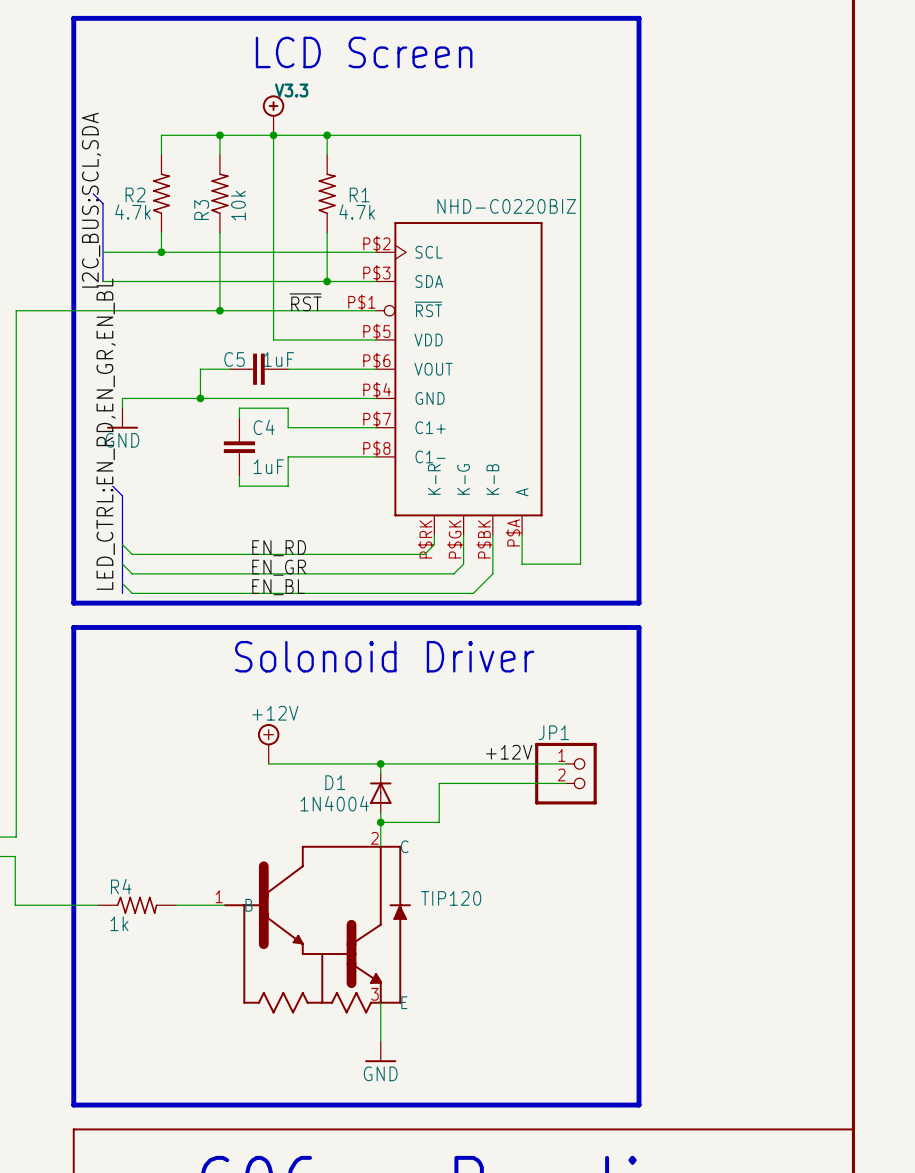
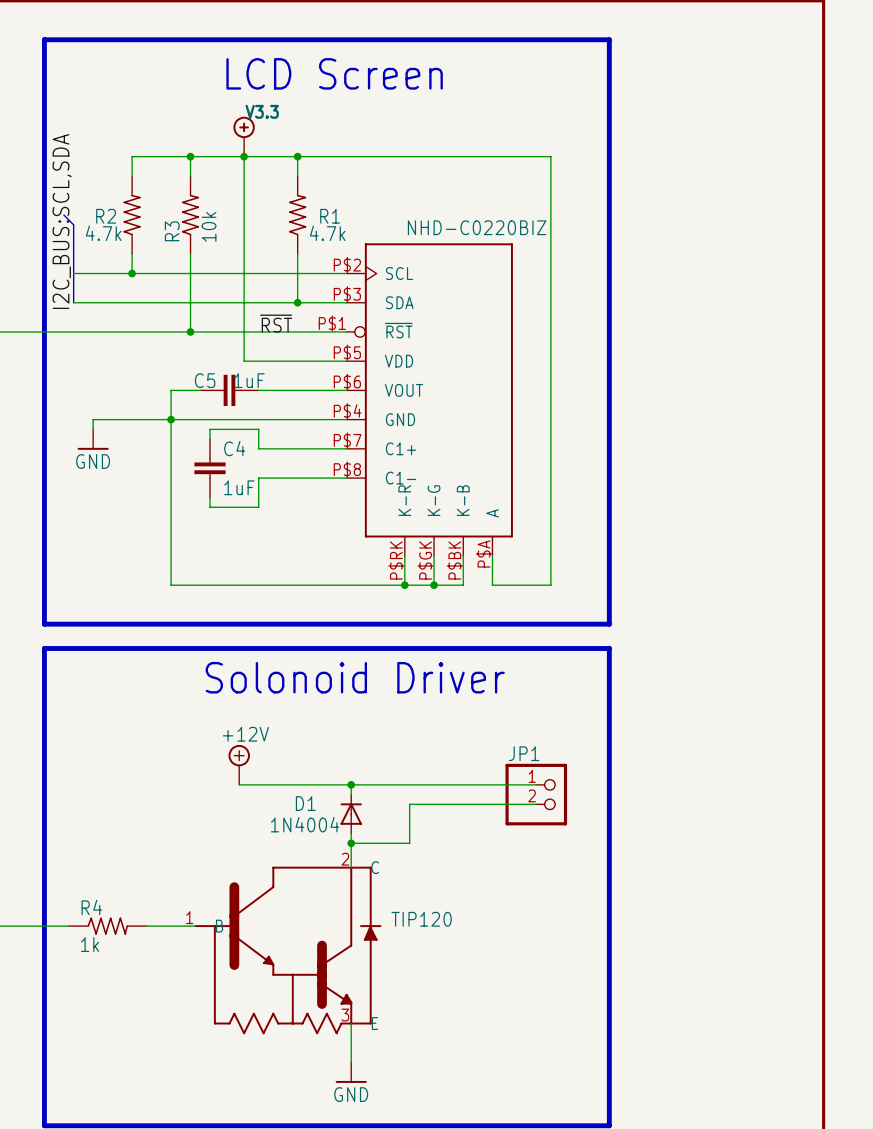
label: LED_CTRL:EN_RD,EN_GR,EN_BL (106, 434) -> none
bus: (112, 486) (122, 495) (122, 593) -> none
wire: (122, 544) (132, 554) (424, 554) (434, 544) -> (404, 585) (404, 565)
label: EN_RD (279, 548) -> none
wire: (122, 564) (132, 573) (453, 573) (463, 564) -> none
junction: none -> (404, 585)
junction: none -> (434, 585)
wire: (492, 564) (492, 573) (473, 593) (132, 593) (122, 583) -> (463, 585) (171, 585) (171, 419)
label: EN_GR (279, 567) -> none
label: EN_BL (278, 587) -> none
label: +12V (509, 752) -> none

